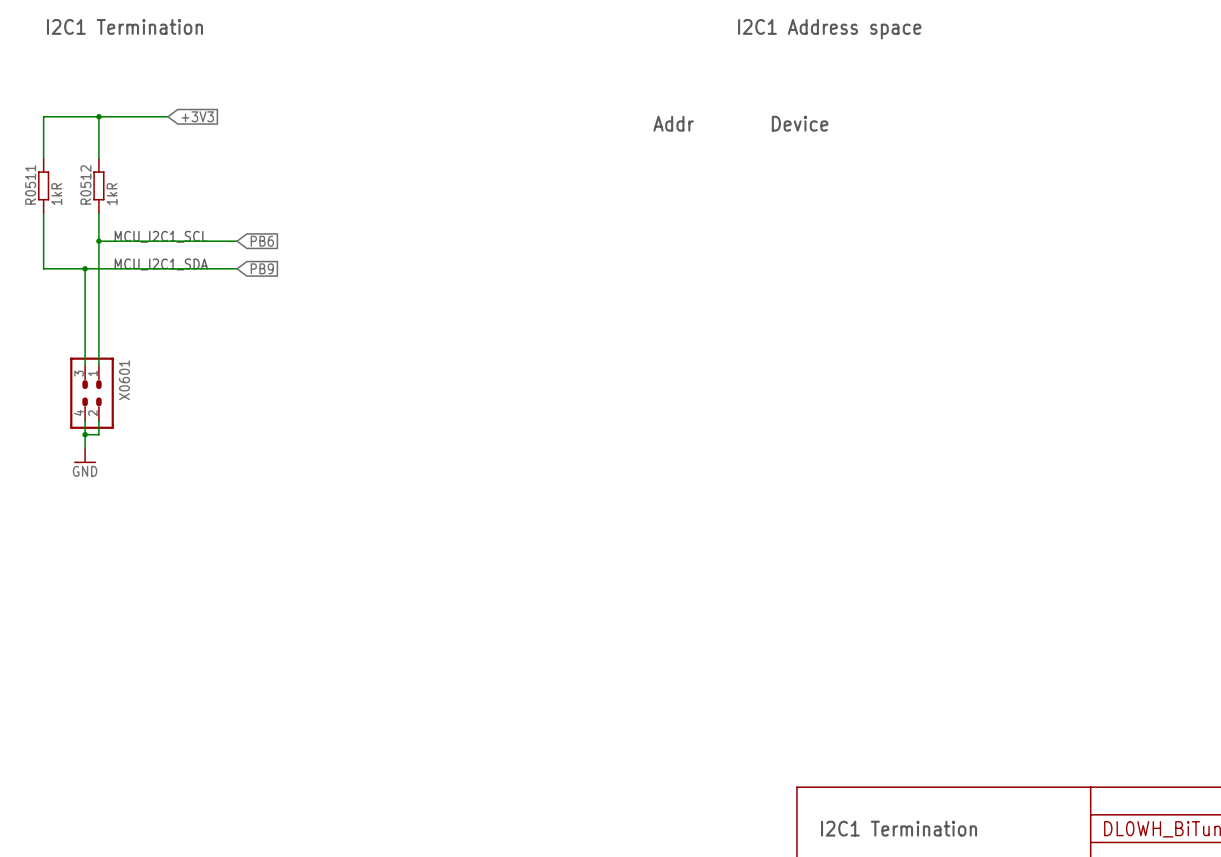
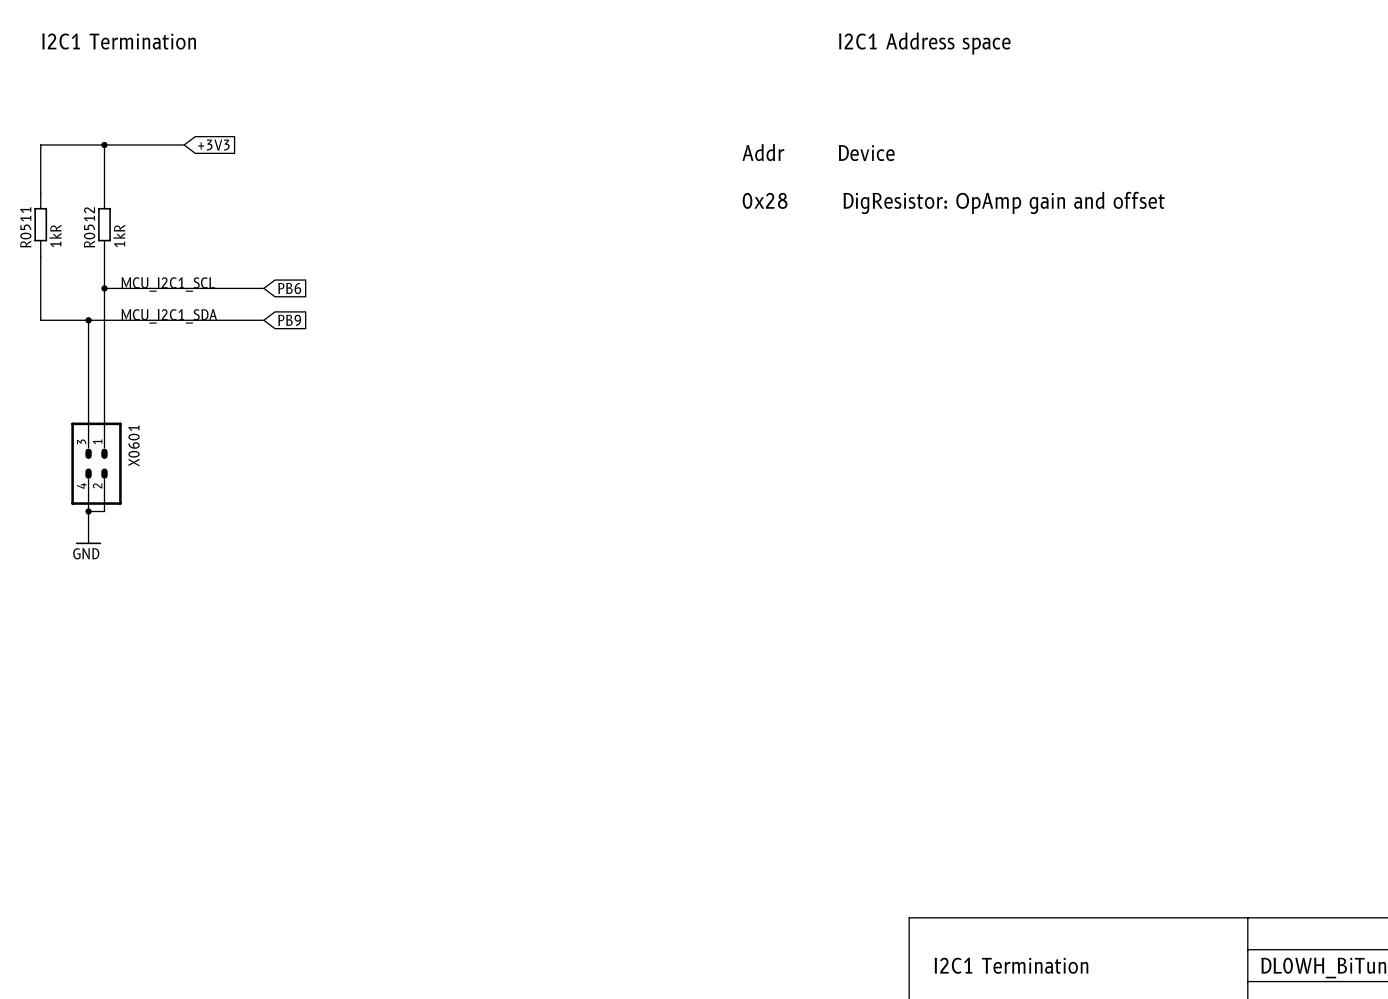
text: none -> 0x28 DigResistor: OpAmp gain and offset (953, 202)

